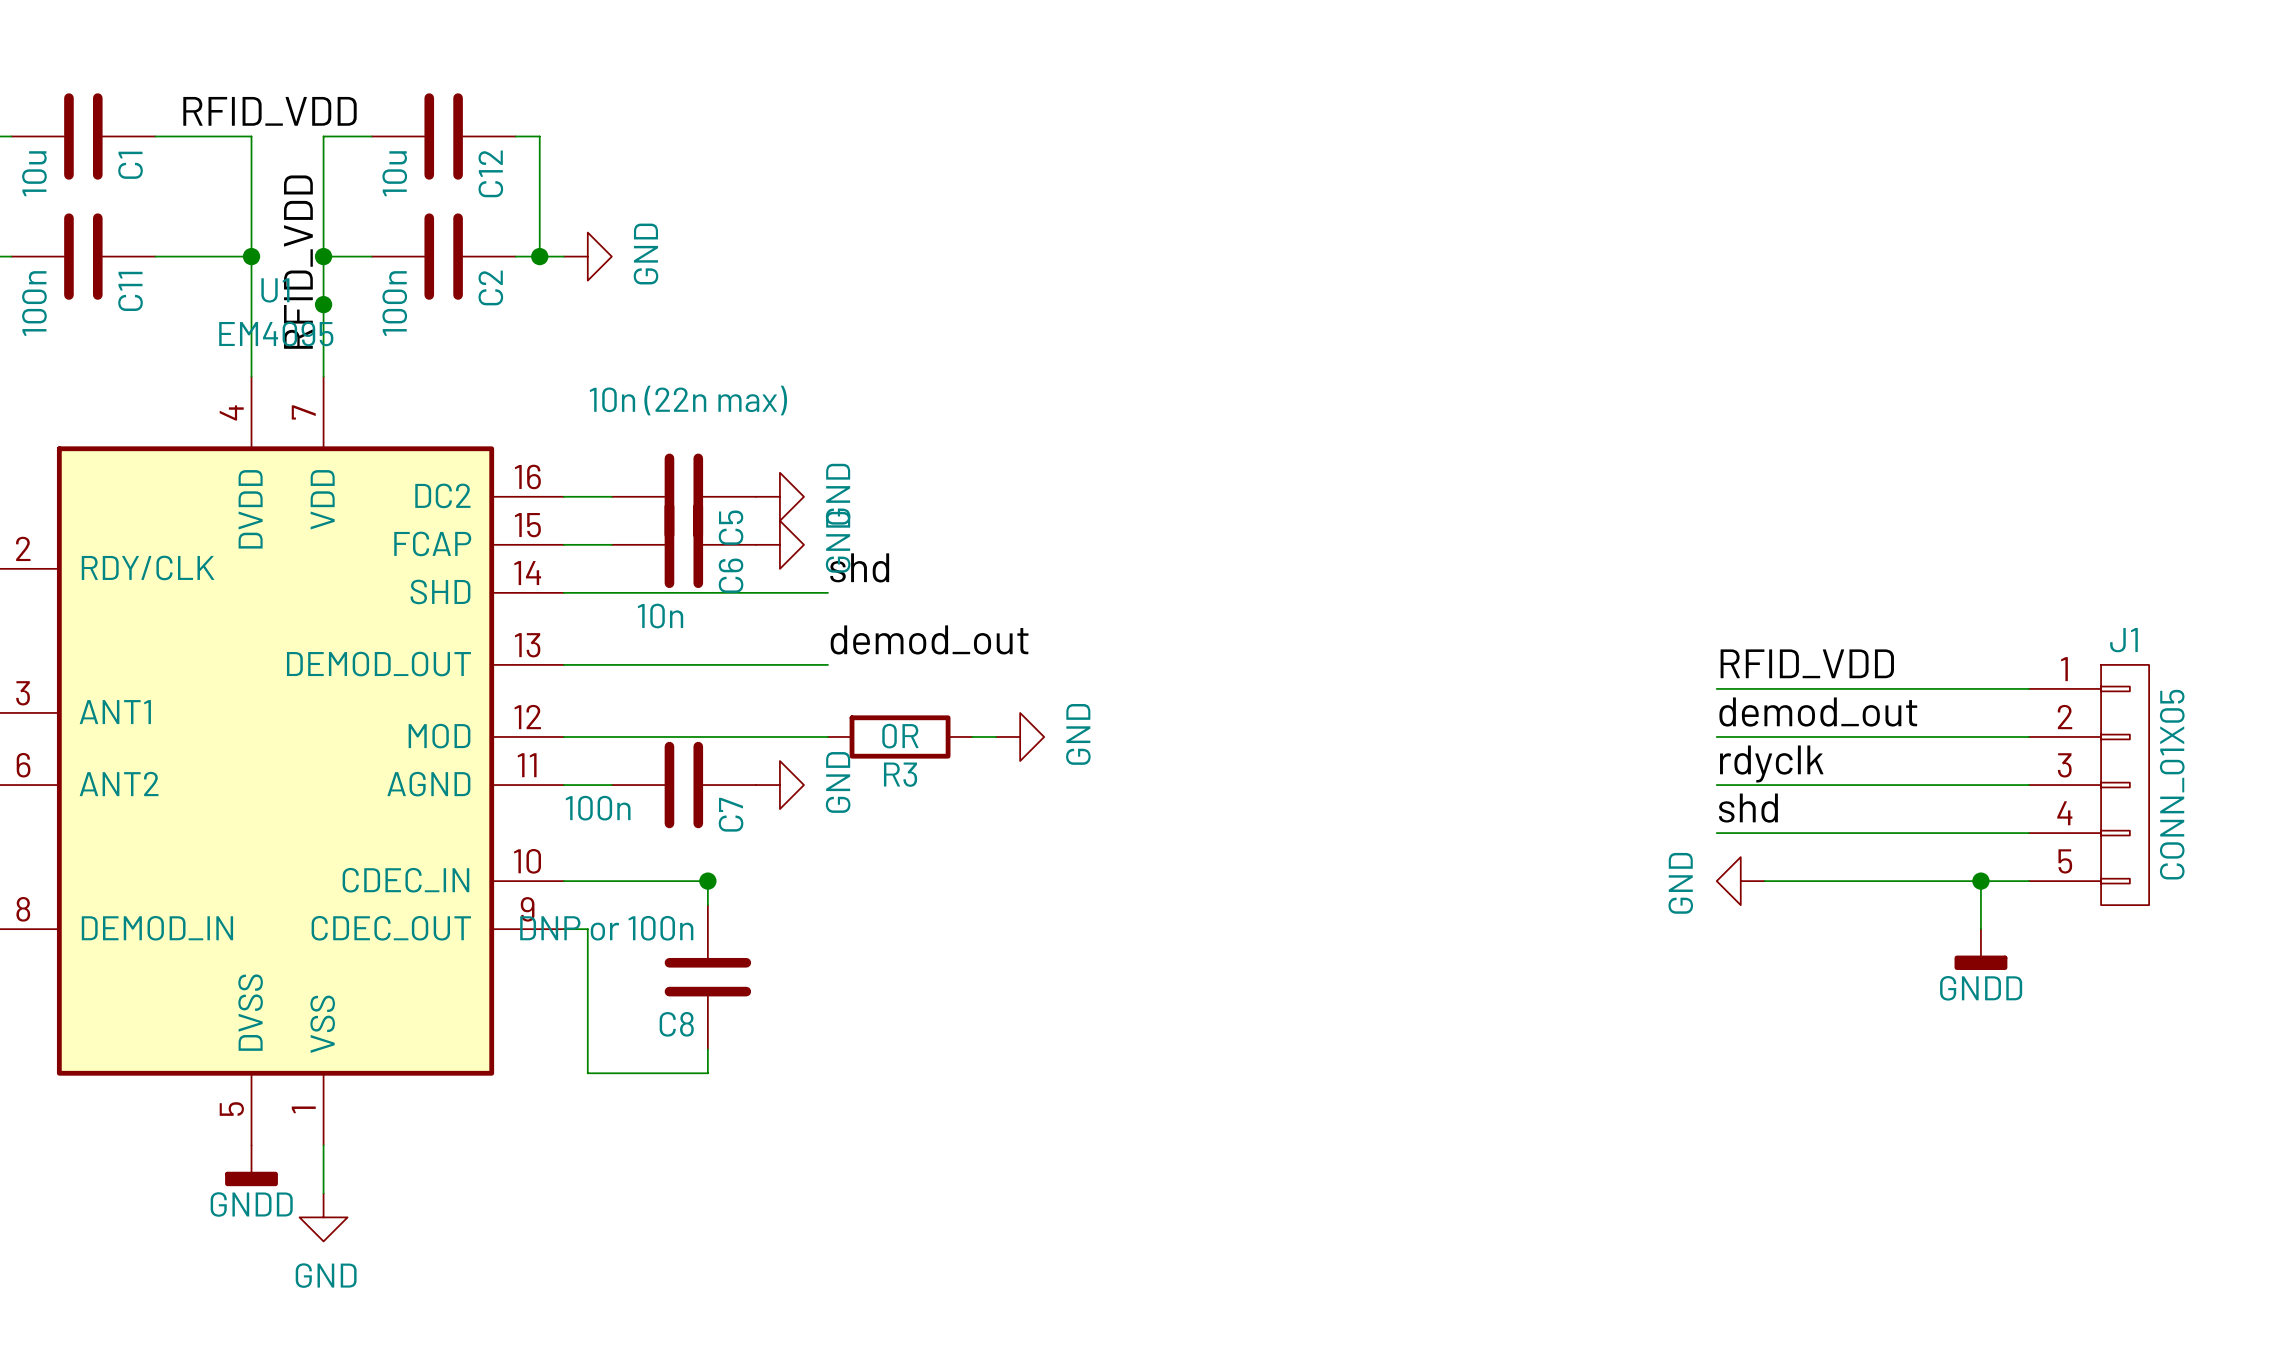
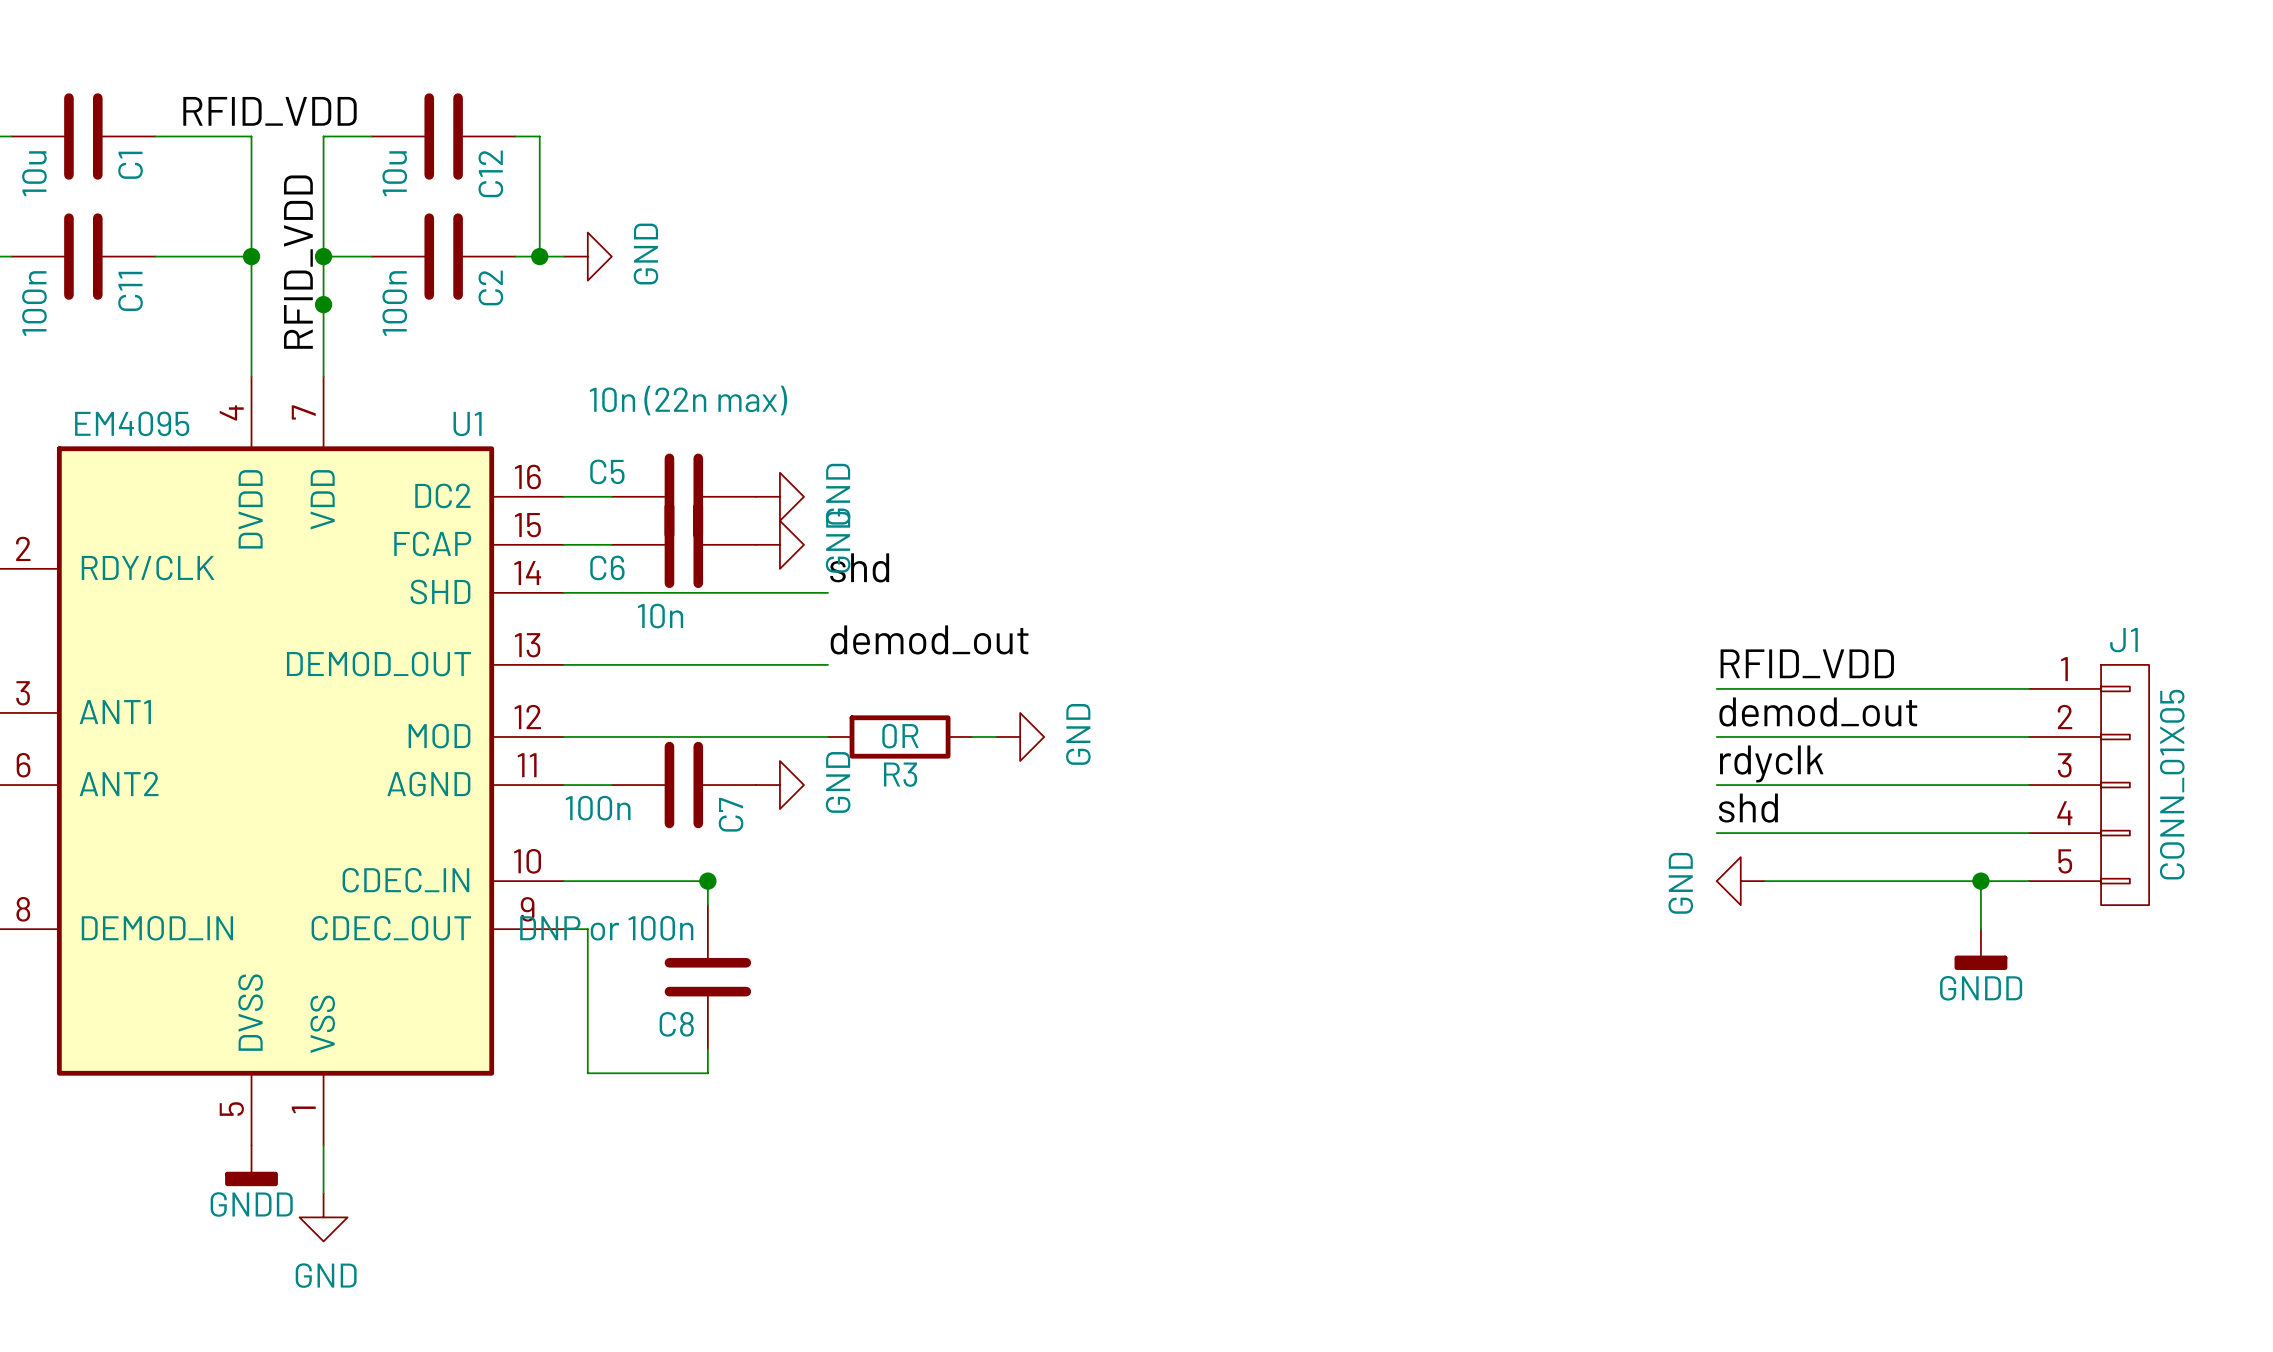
U1 name position: U1 (275, 290) -> U1 (467, 423)
U1 value position: EM4095 (276, 334) -> EM4095 (132, 423)
C5 name rotation: 0° (731, 527) -> 90° clockwise (607, 471)
C5 name position: C5 (731, 527) -> C5 (607, 471)
C6 name rotation: 0° (731, 575) -> 90° clockwise (607, 567)
C6 name position: C6 (731, 575) -> C6 (607, 567)

